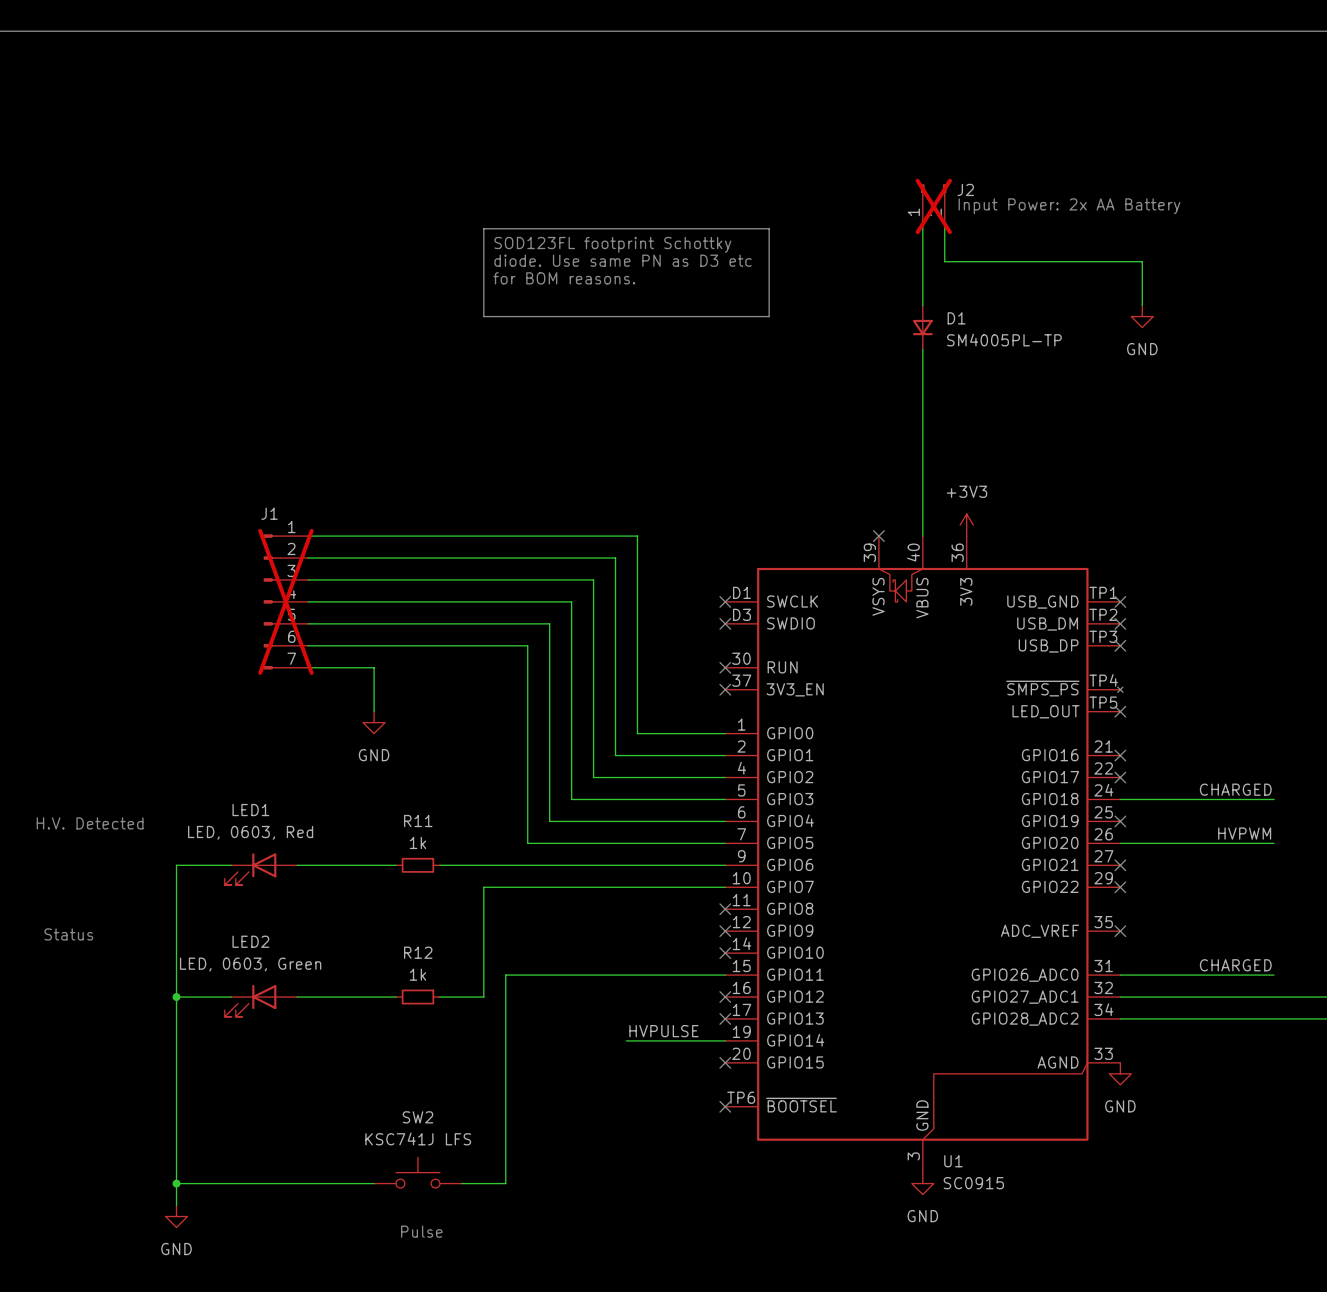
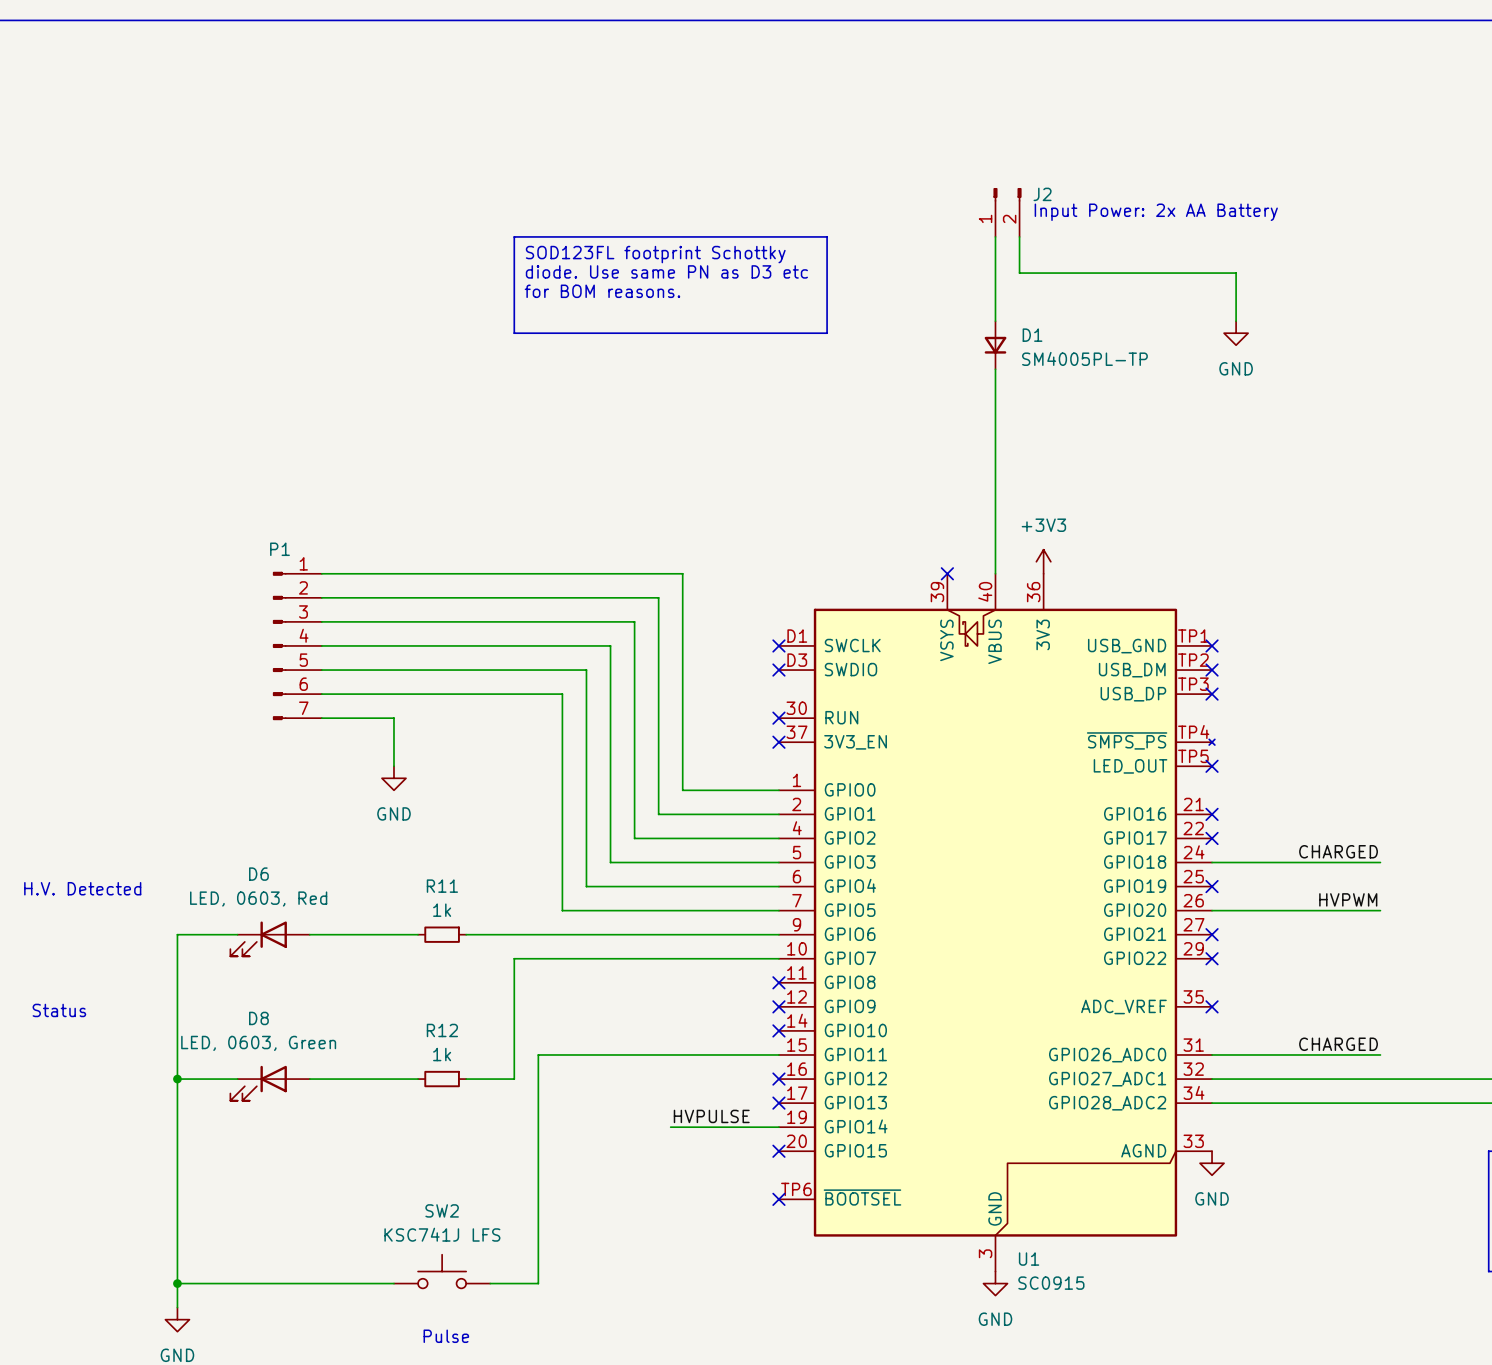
J2 do-not-place cross: (933, 206) -> none
J1 name: J1 (269, 513) -> P1 (279, 549)
J1 do-not-place cross: (285, 601) -> none
LED1 name: LED1 (250, 810) -> D6 (258, 874)
LED2 name: LED2 (250, 941) -> D8 (258, 1018)

